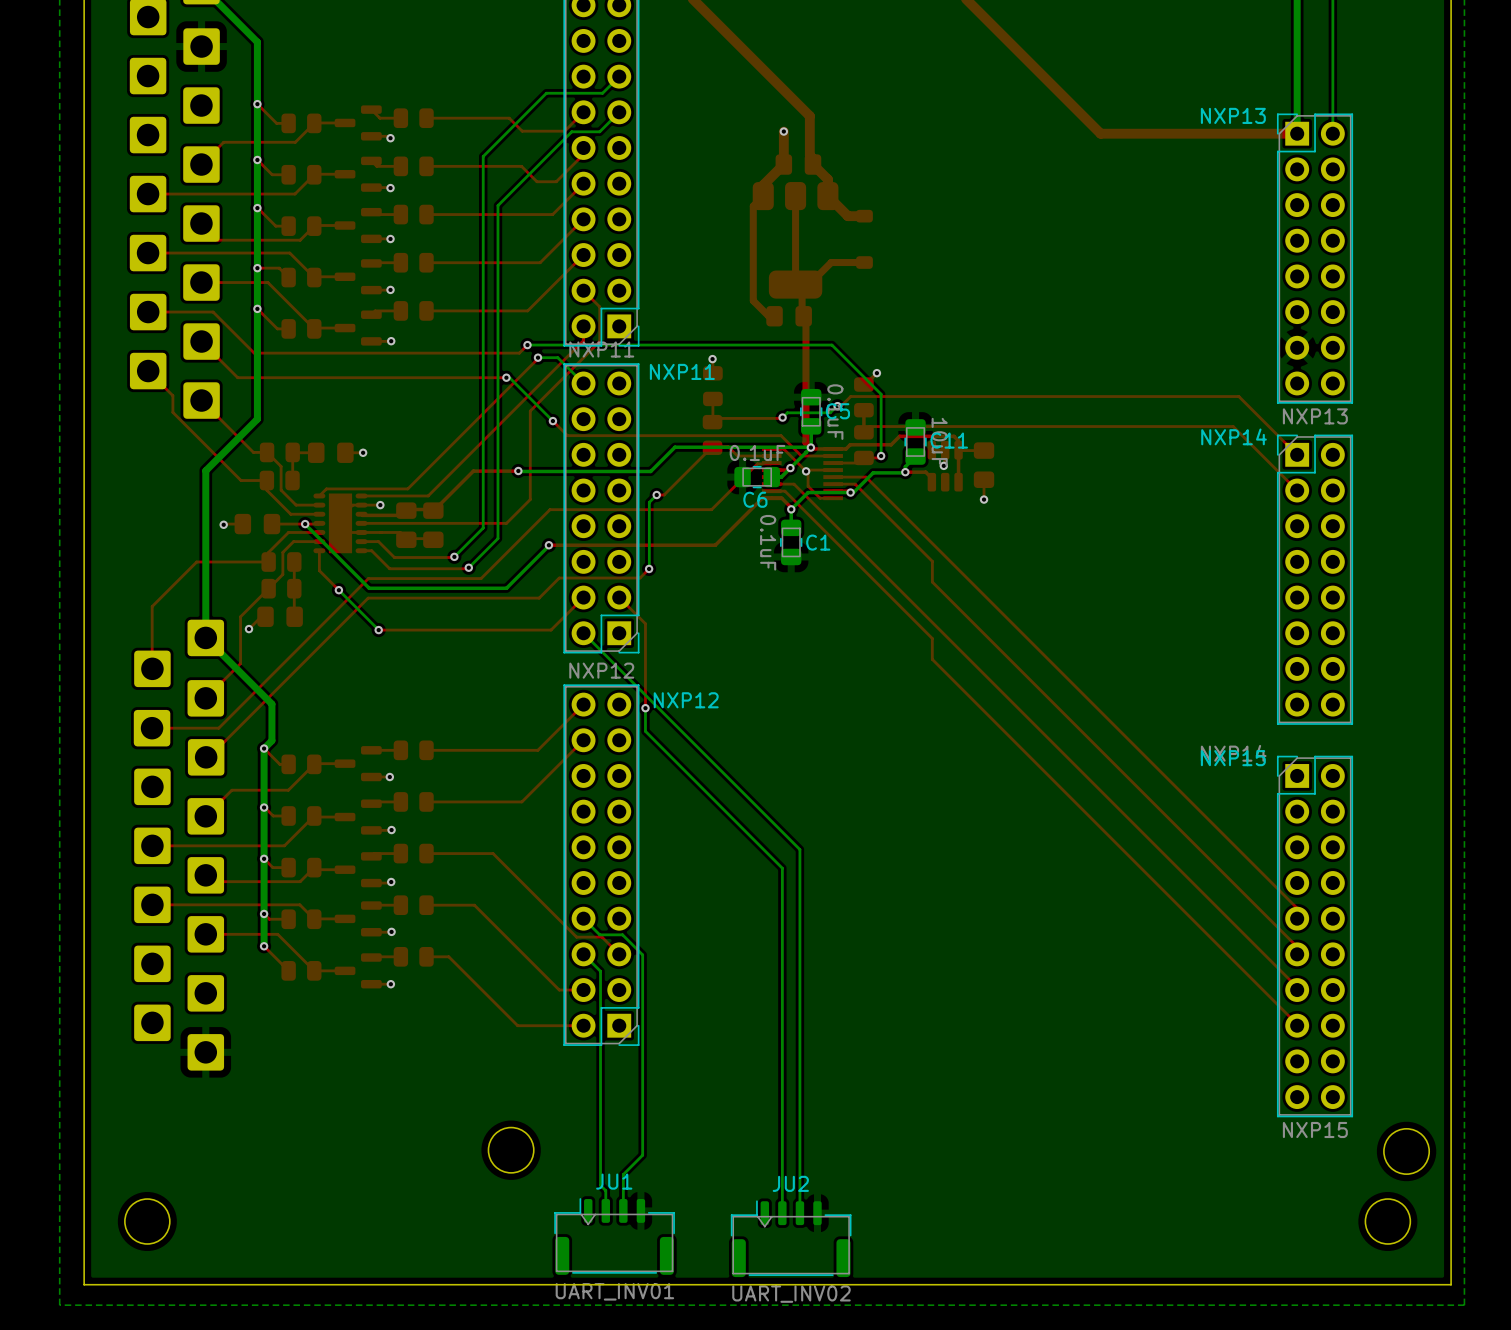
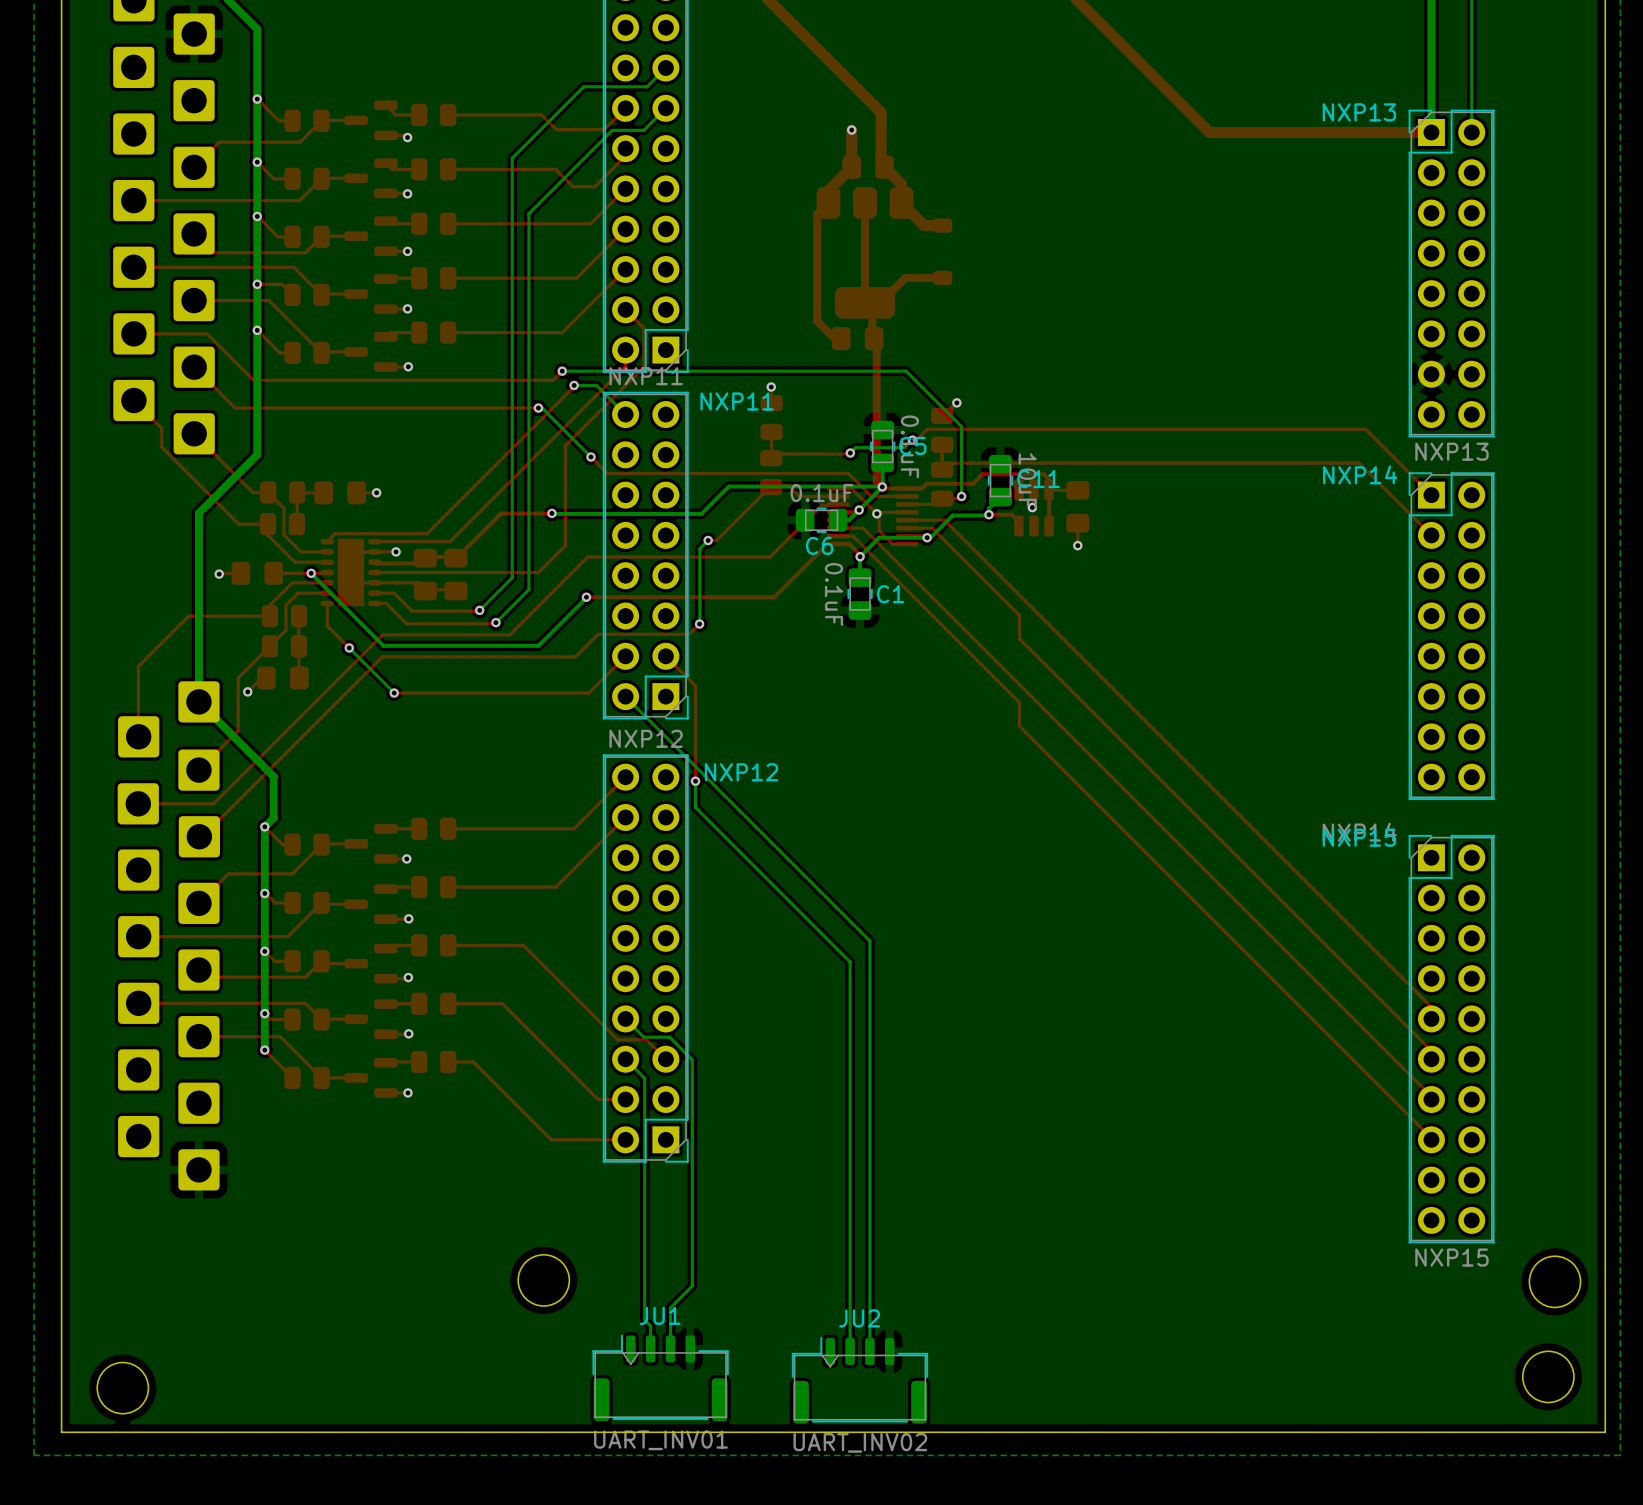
round board edge: [124, 1198, 171, 1245] -> none
round board edge: [1364, 1198, 1412, 1245] -> none
round board edge: none -> [1522, 1350, 1575, 1403]
round board edge: none -> [96, 1362, 149, 1415]

